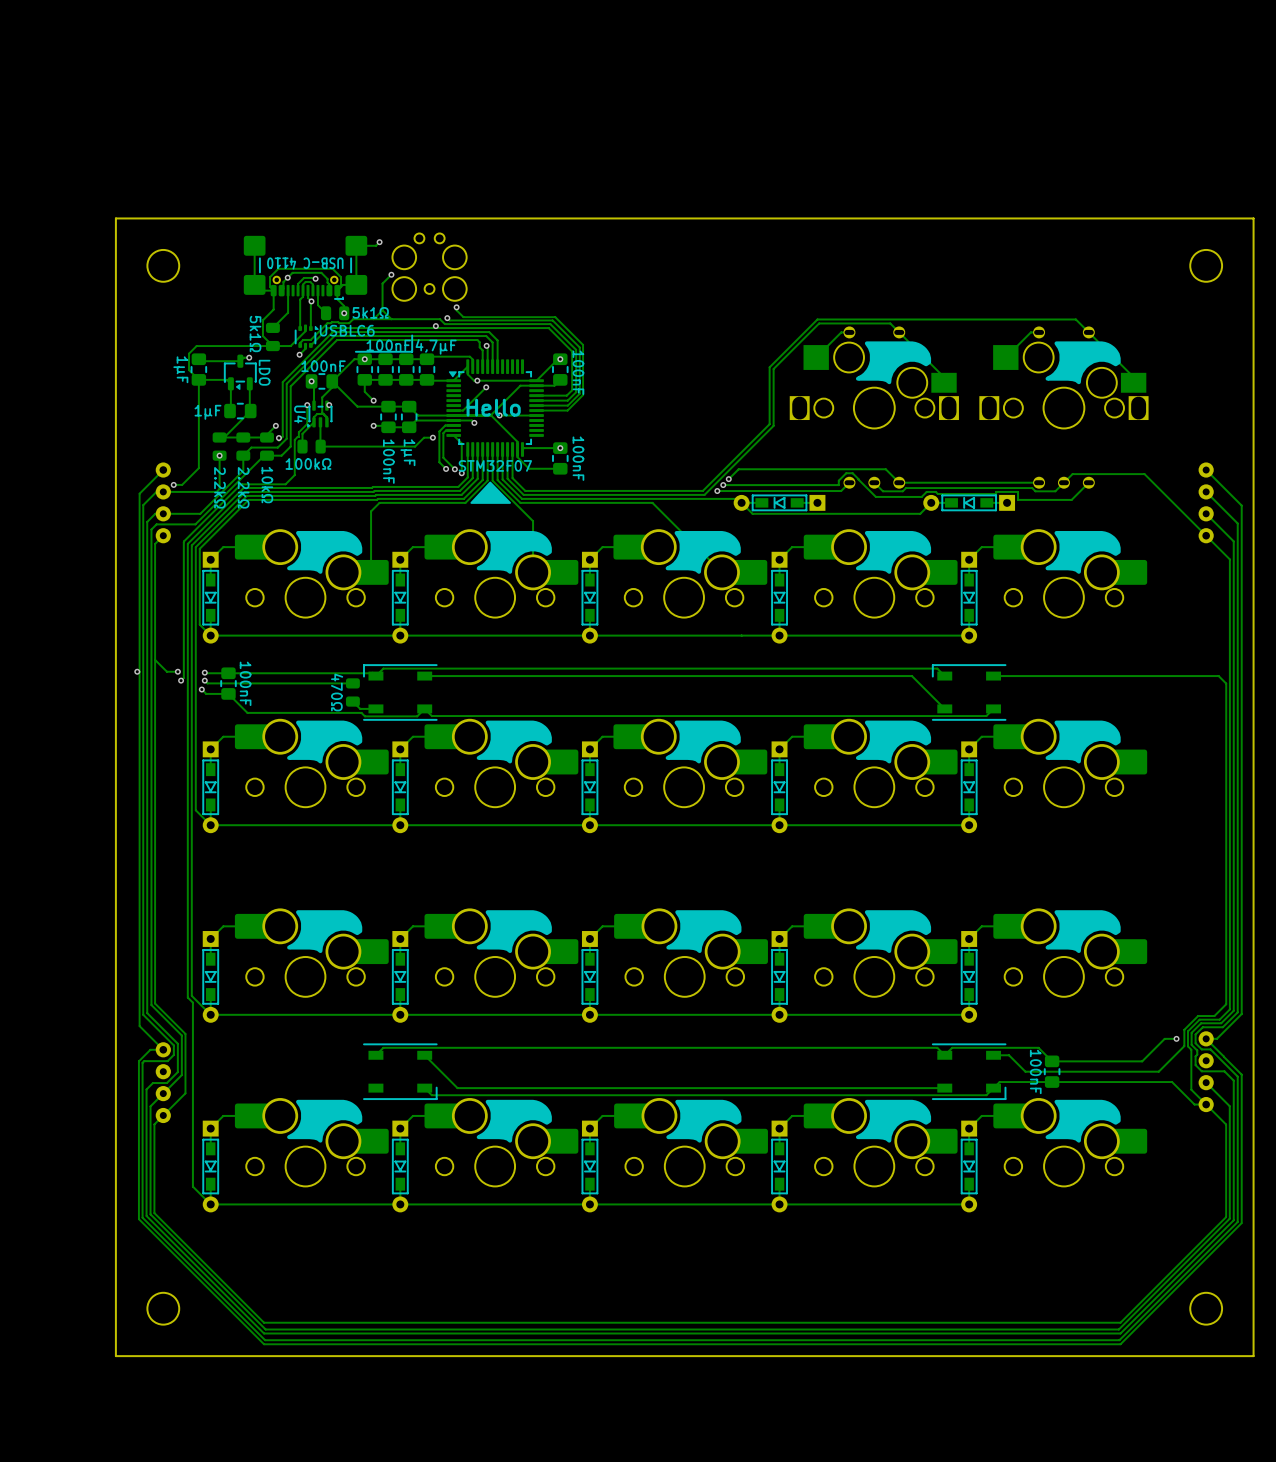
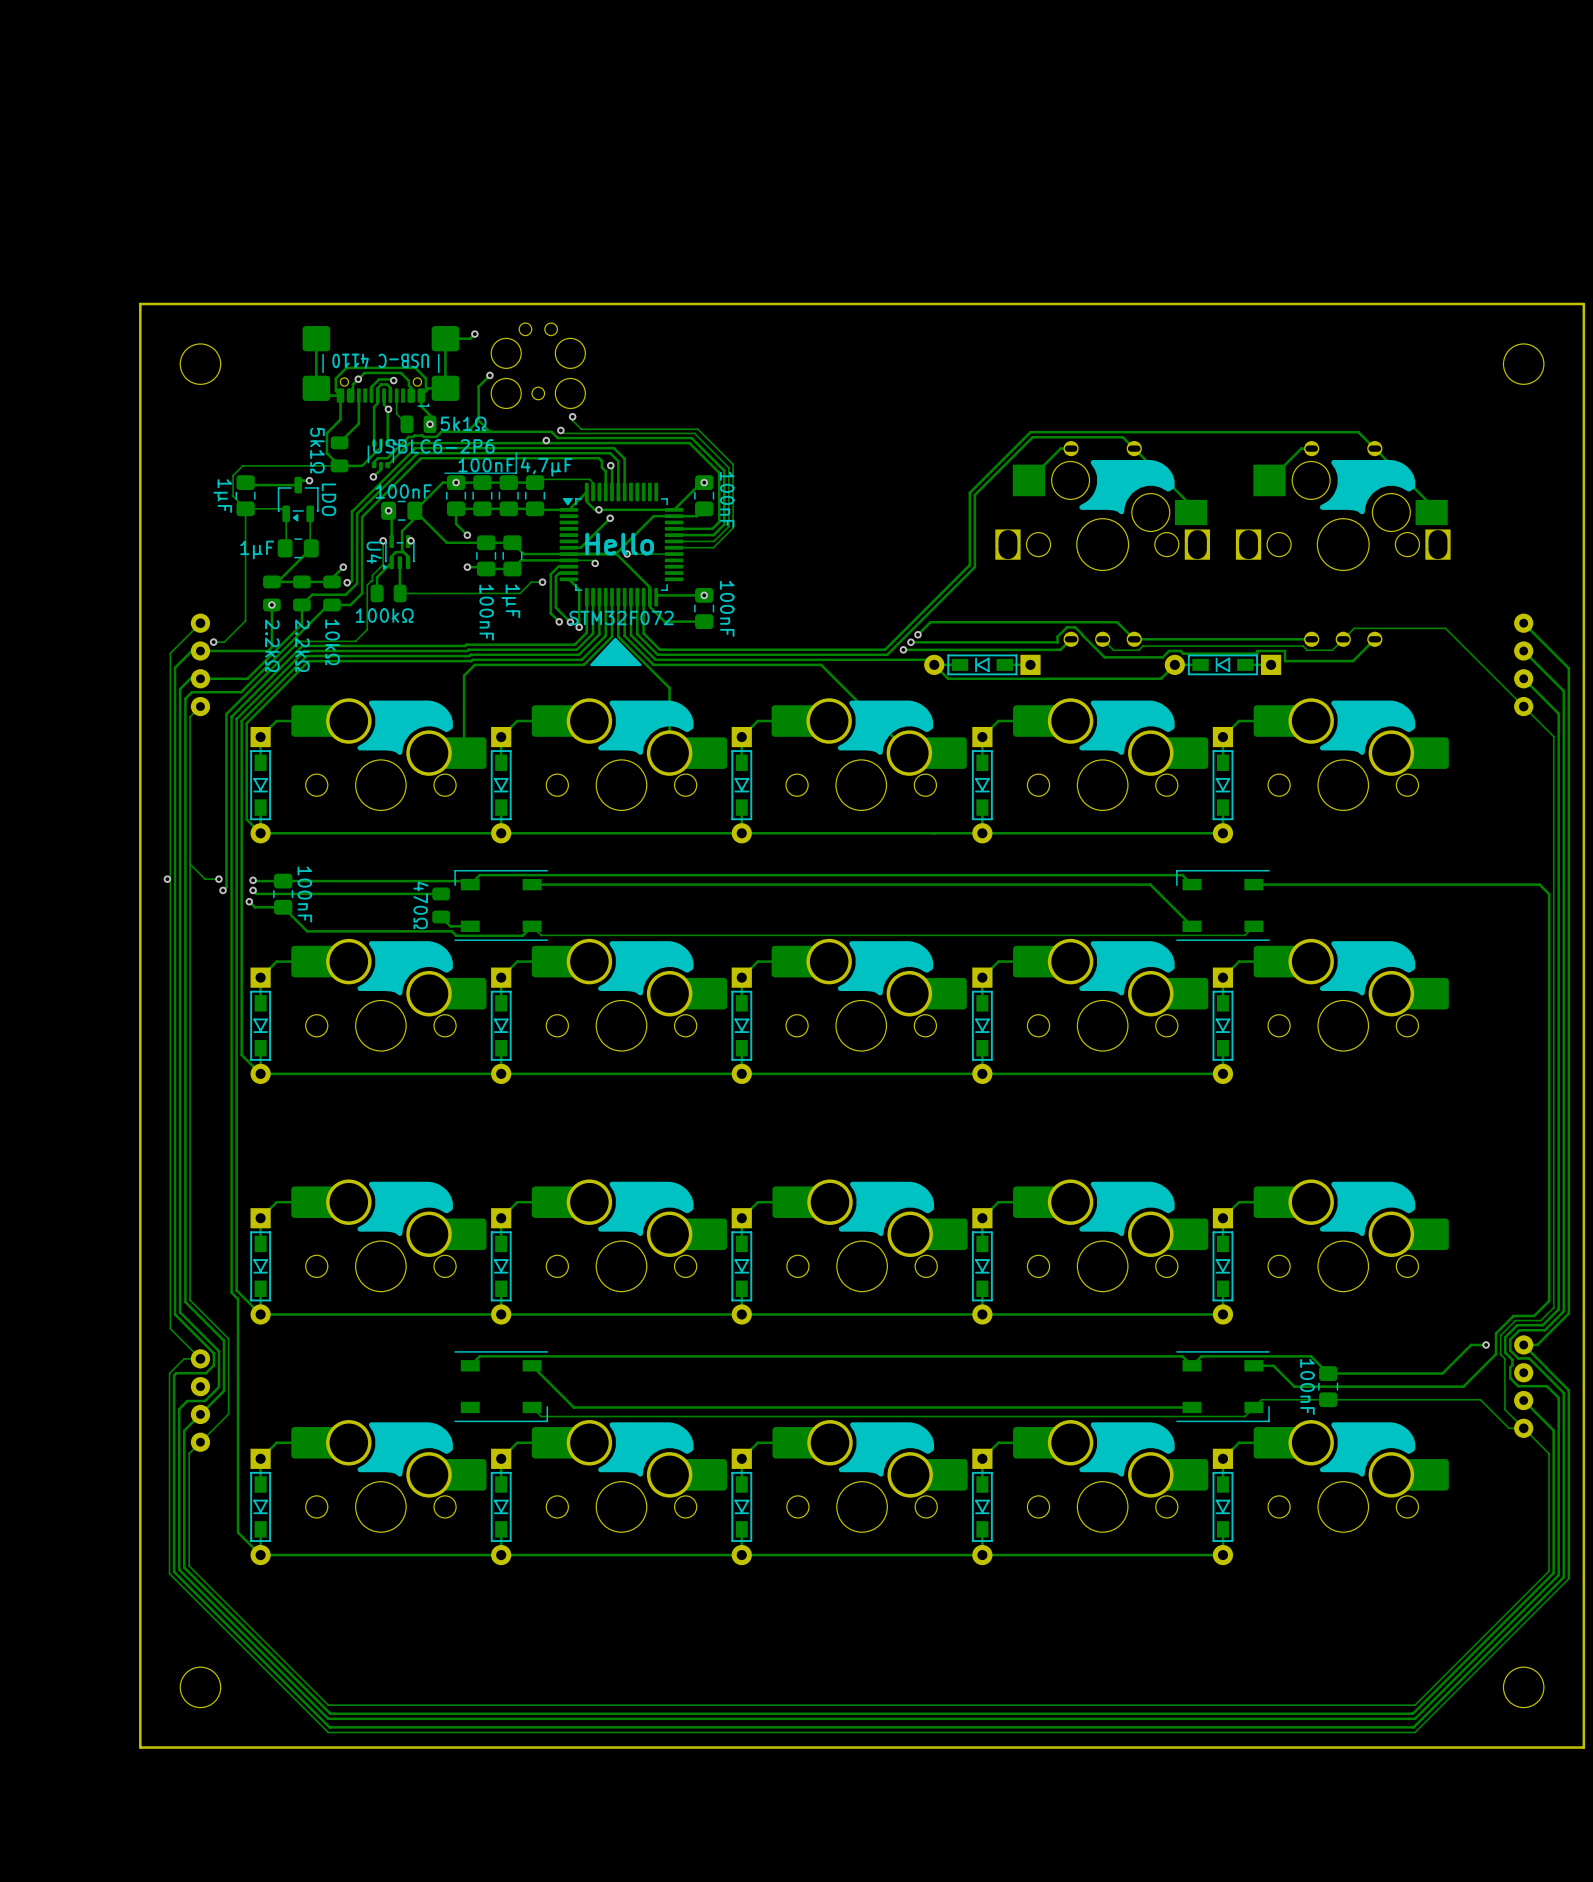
part value: USBLC6 (347, 330) -> USBLC6-2P6 (433, 446)
part value: STM32F07 (495, 465) -> STM32F072 (621, 618)

